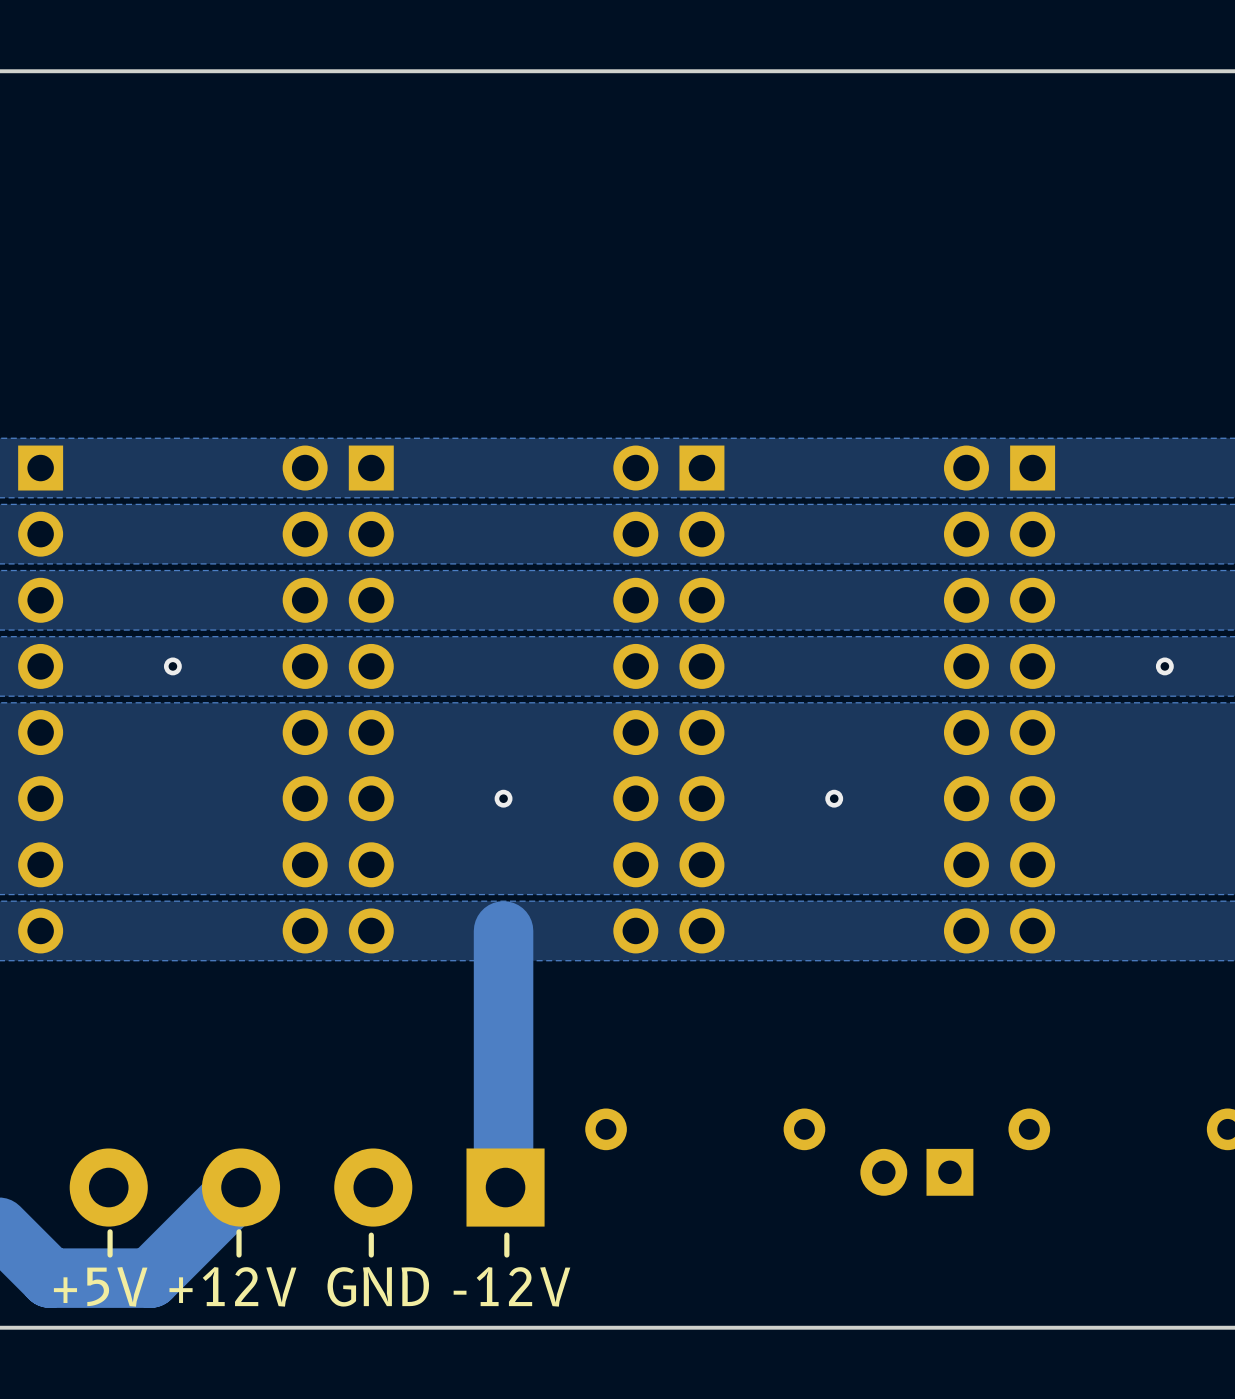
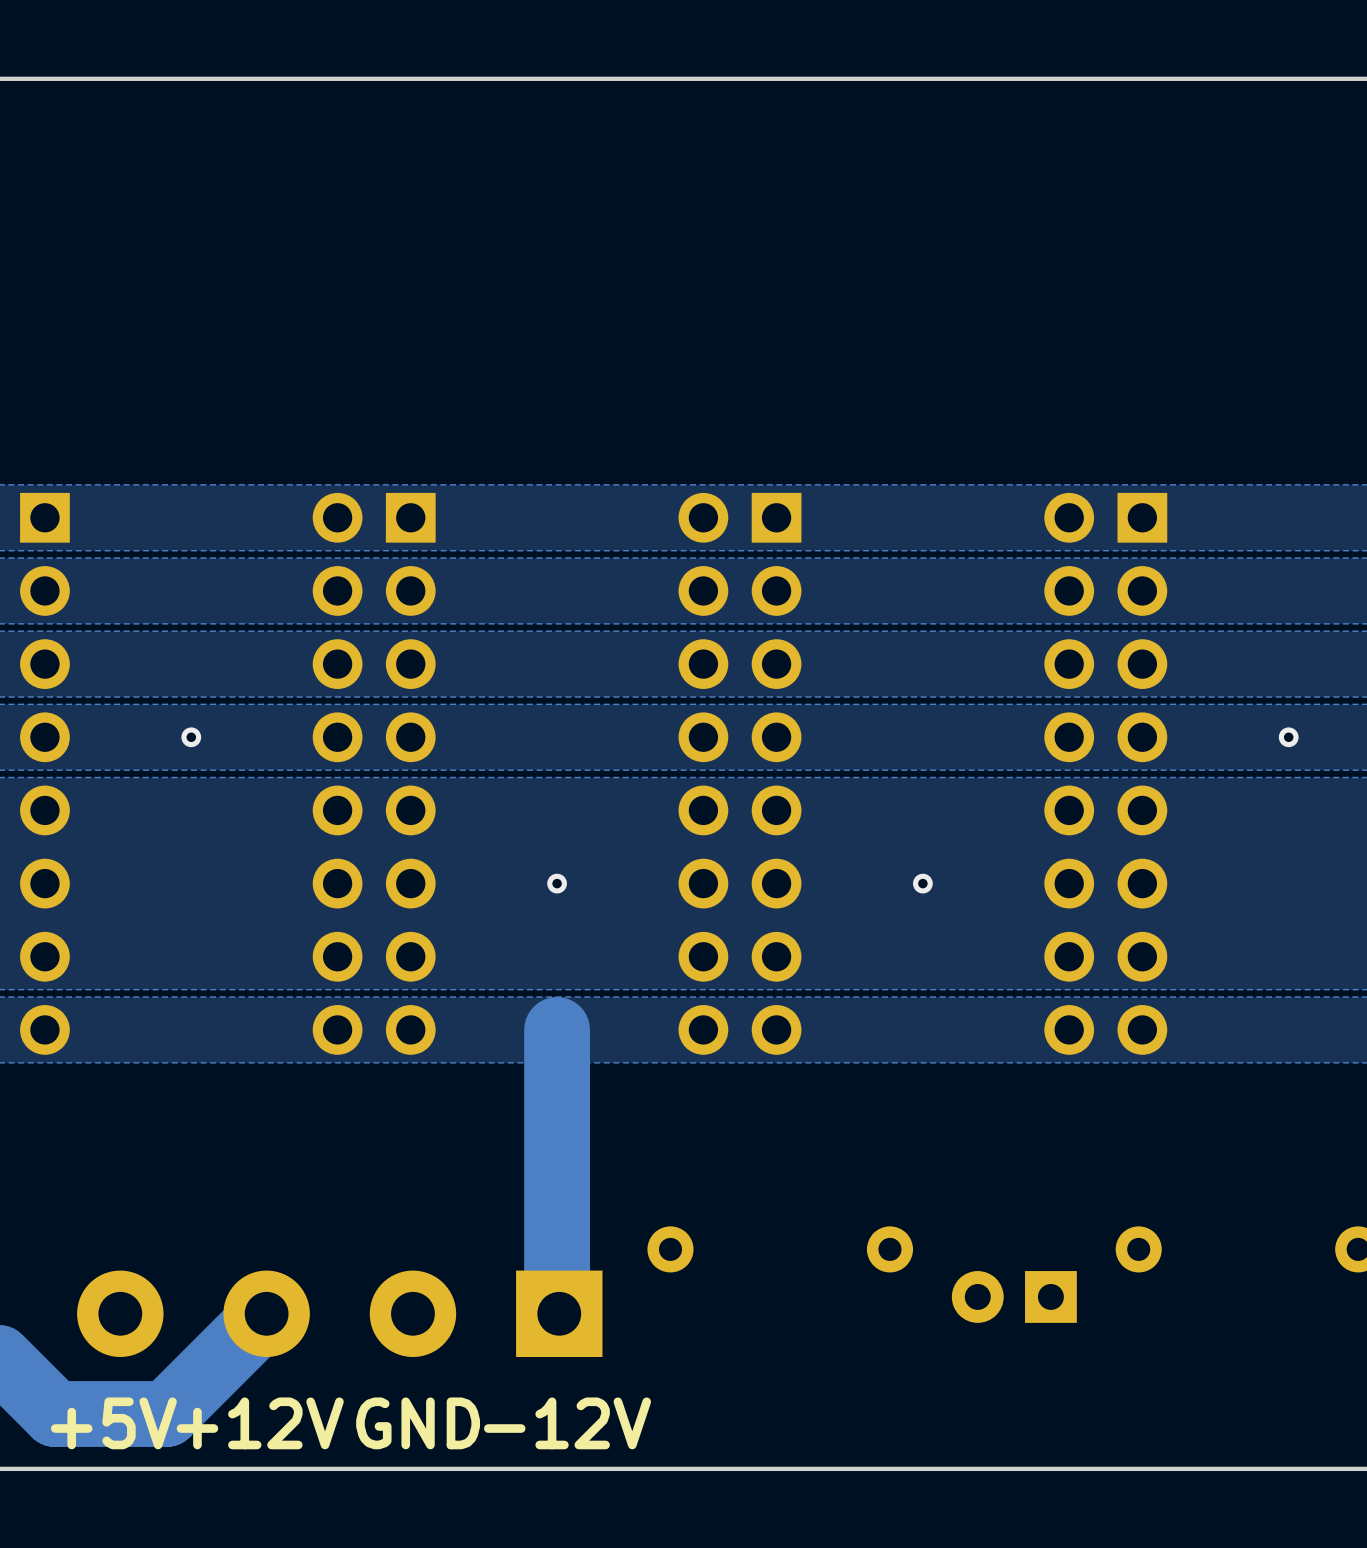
line: (110, 1231) (110, 1254) -> none
line: (239, 1231) (239, 1254) -> none
line: (371, 1235) (371, 1254) -> none
line: (506, 1235) (506, 1254) -> none

